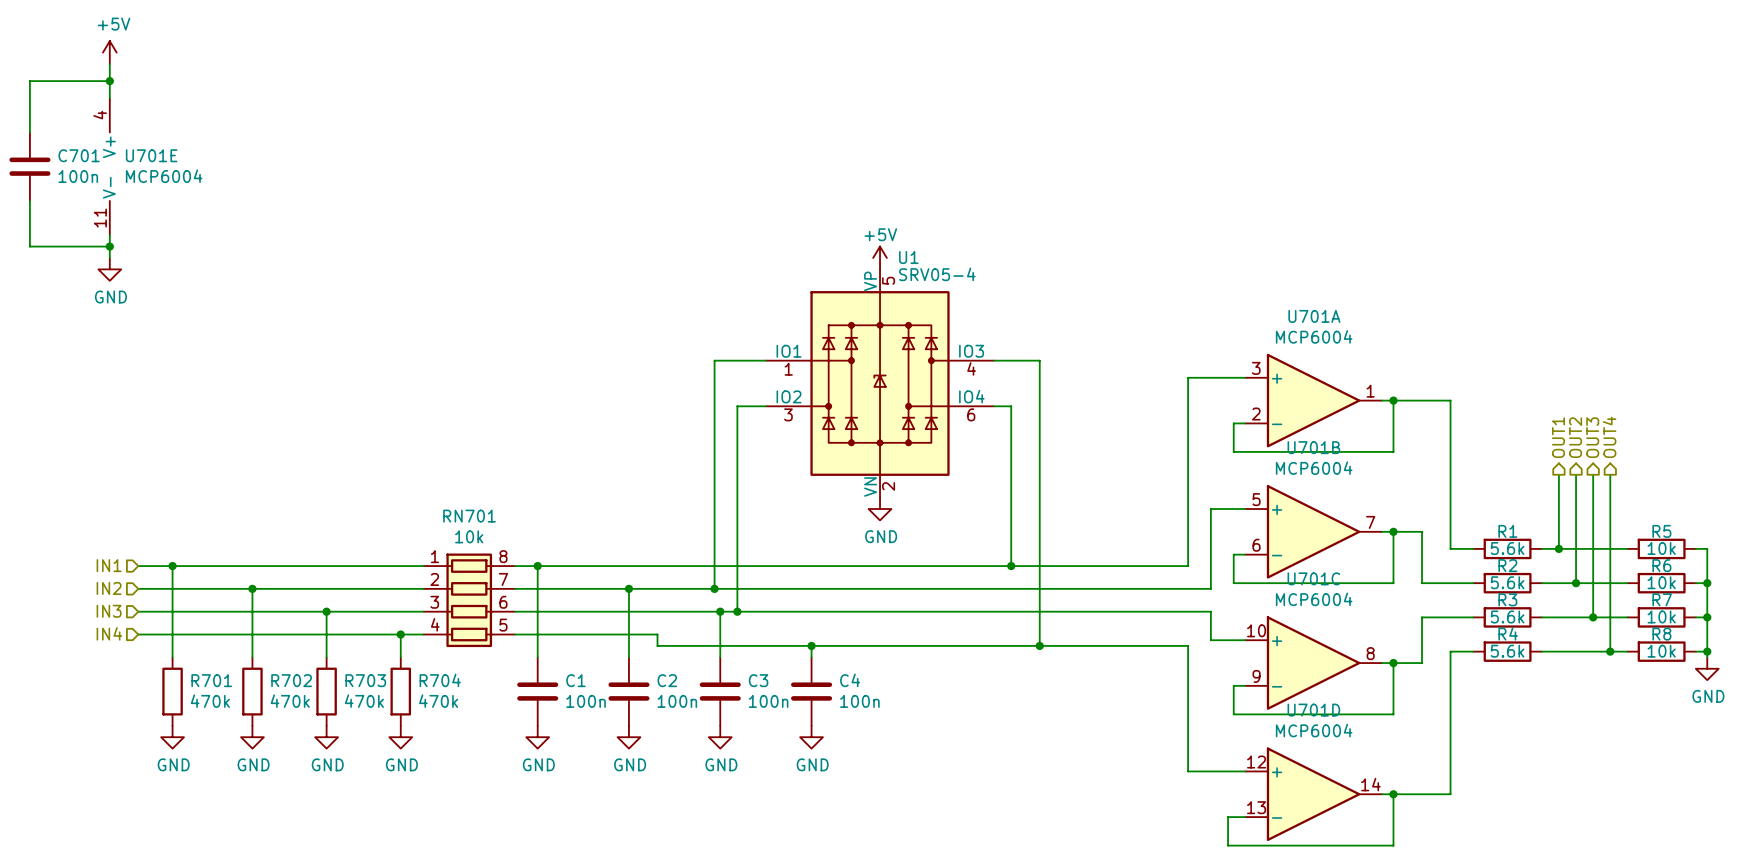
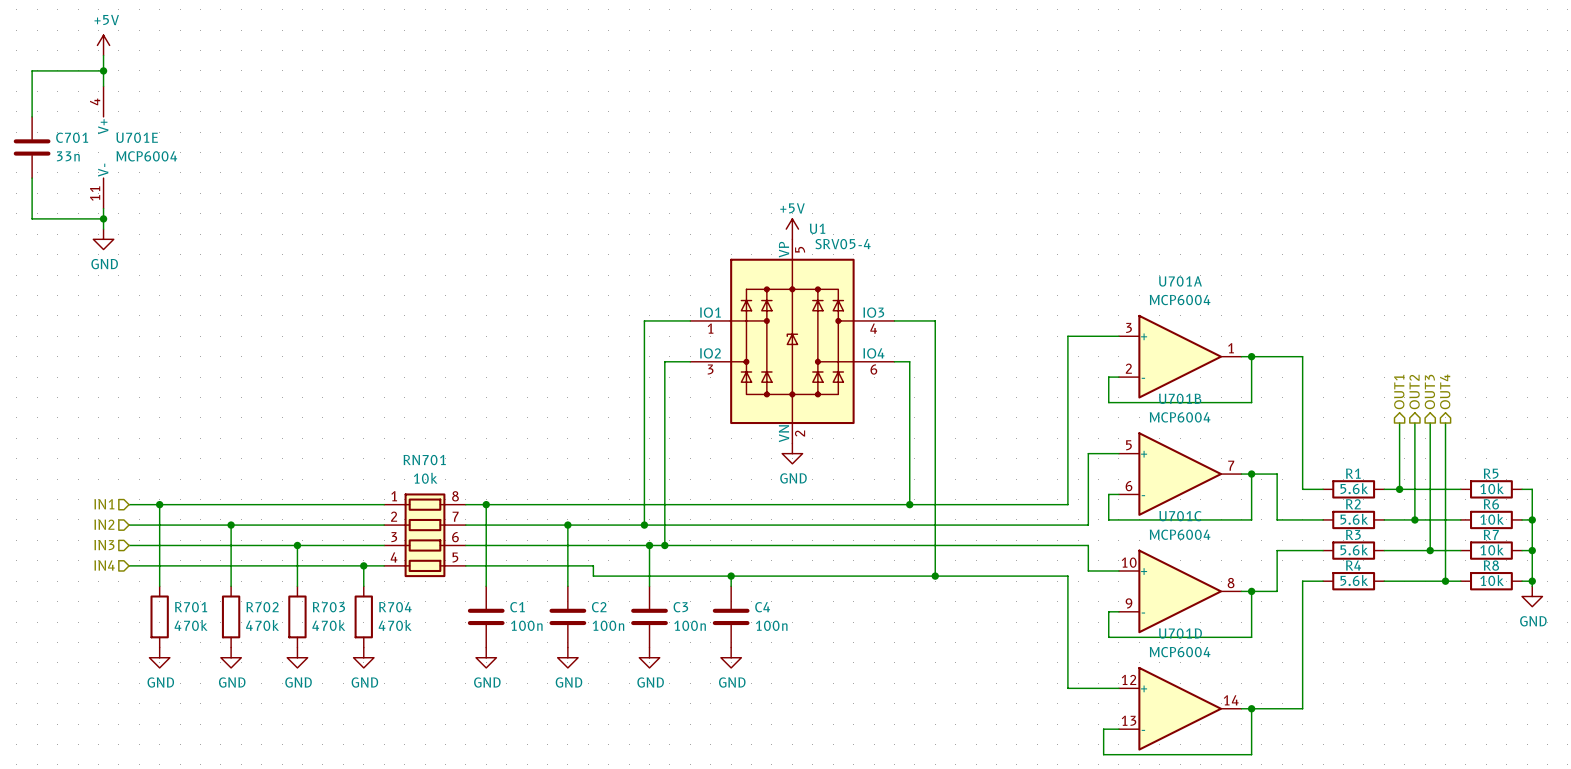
C701 value: 100n (78, 176) -> 33n (68, 156)

